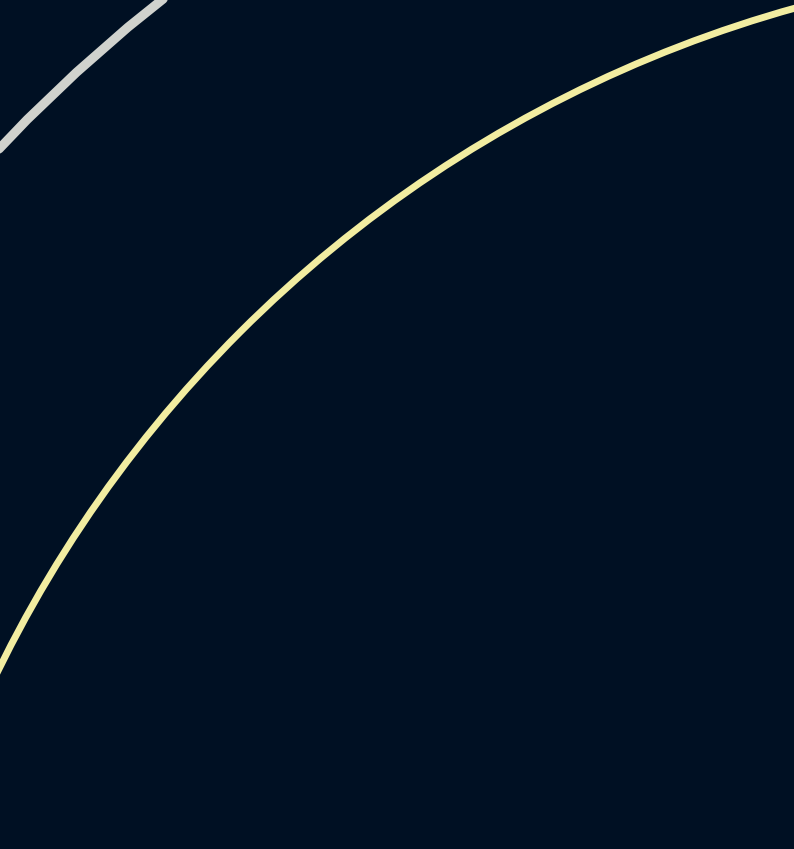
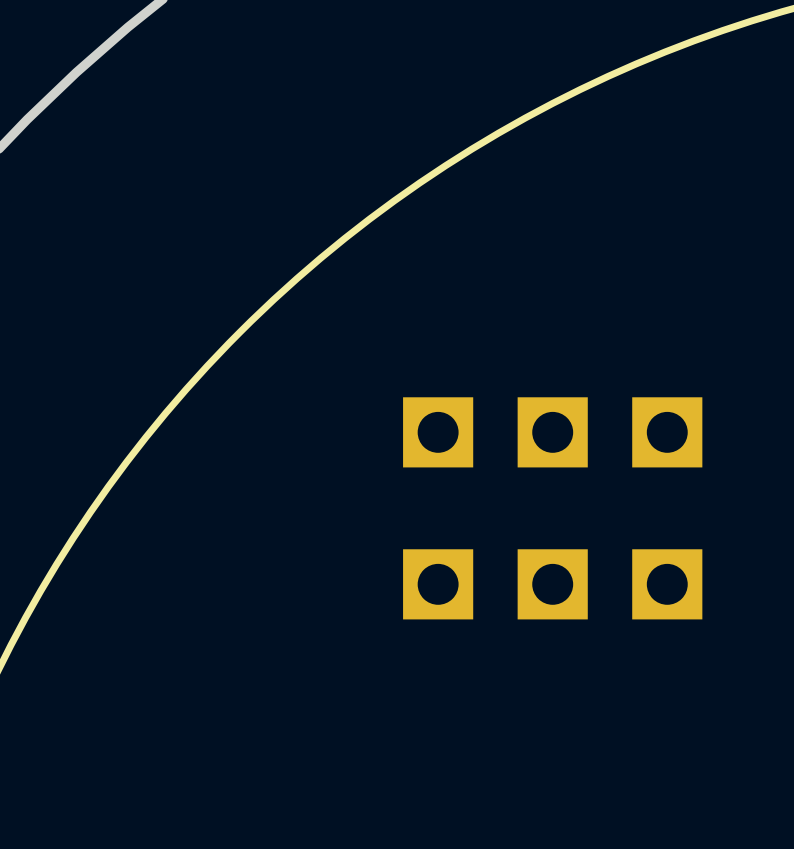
part: none -> (552, 508)

